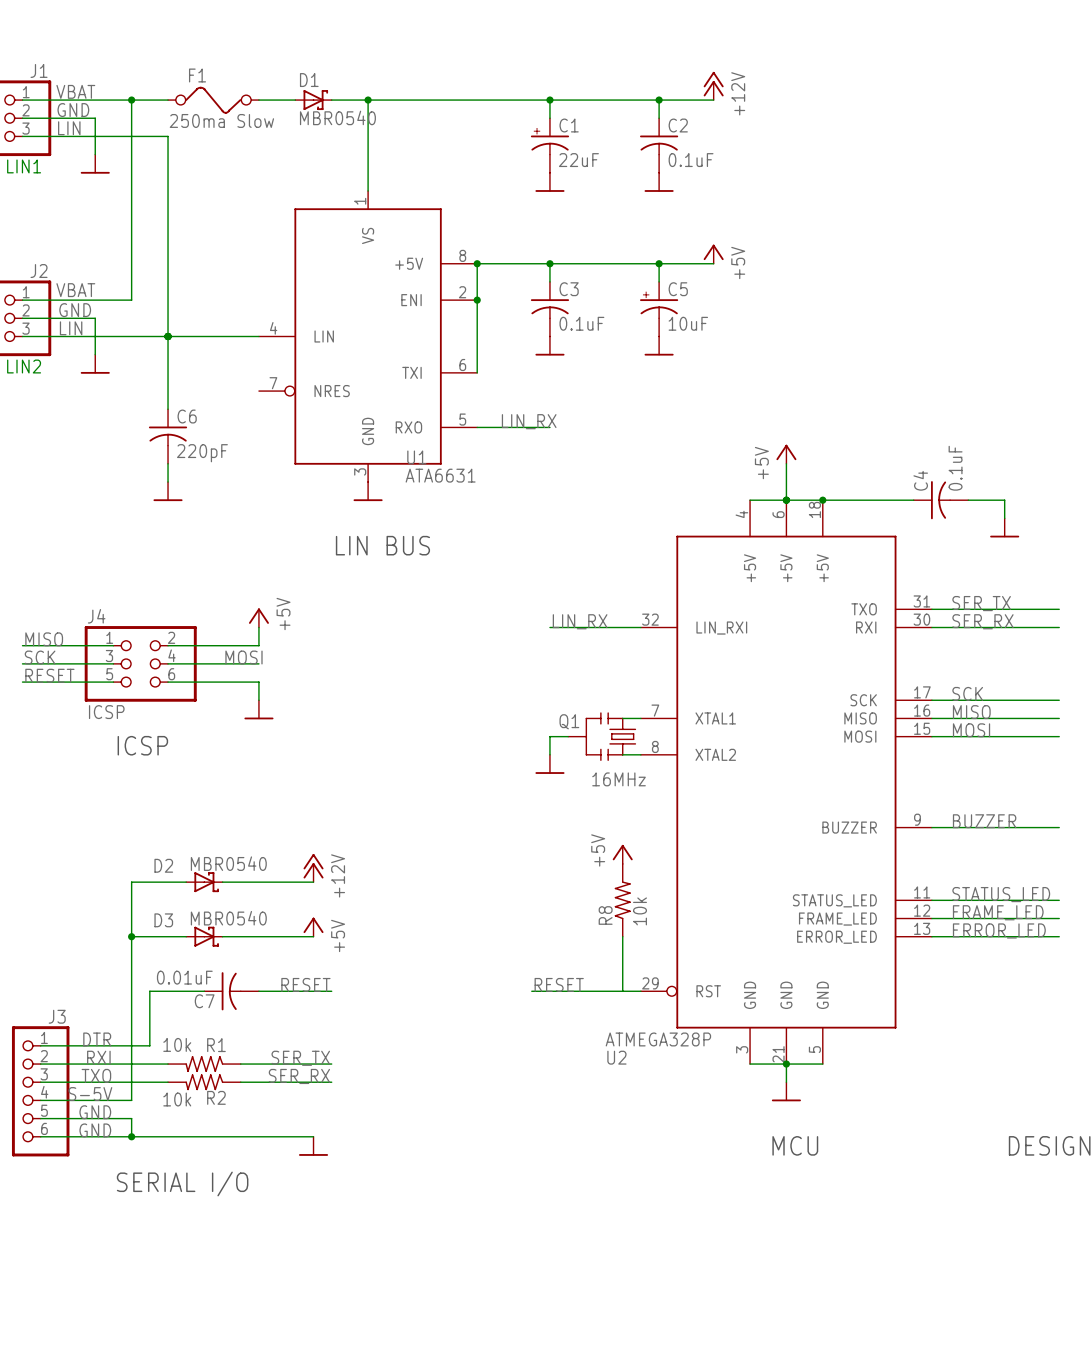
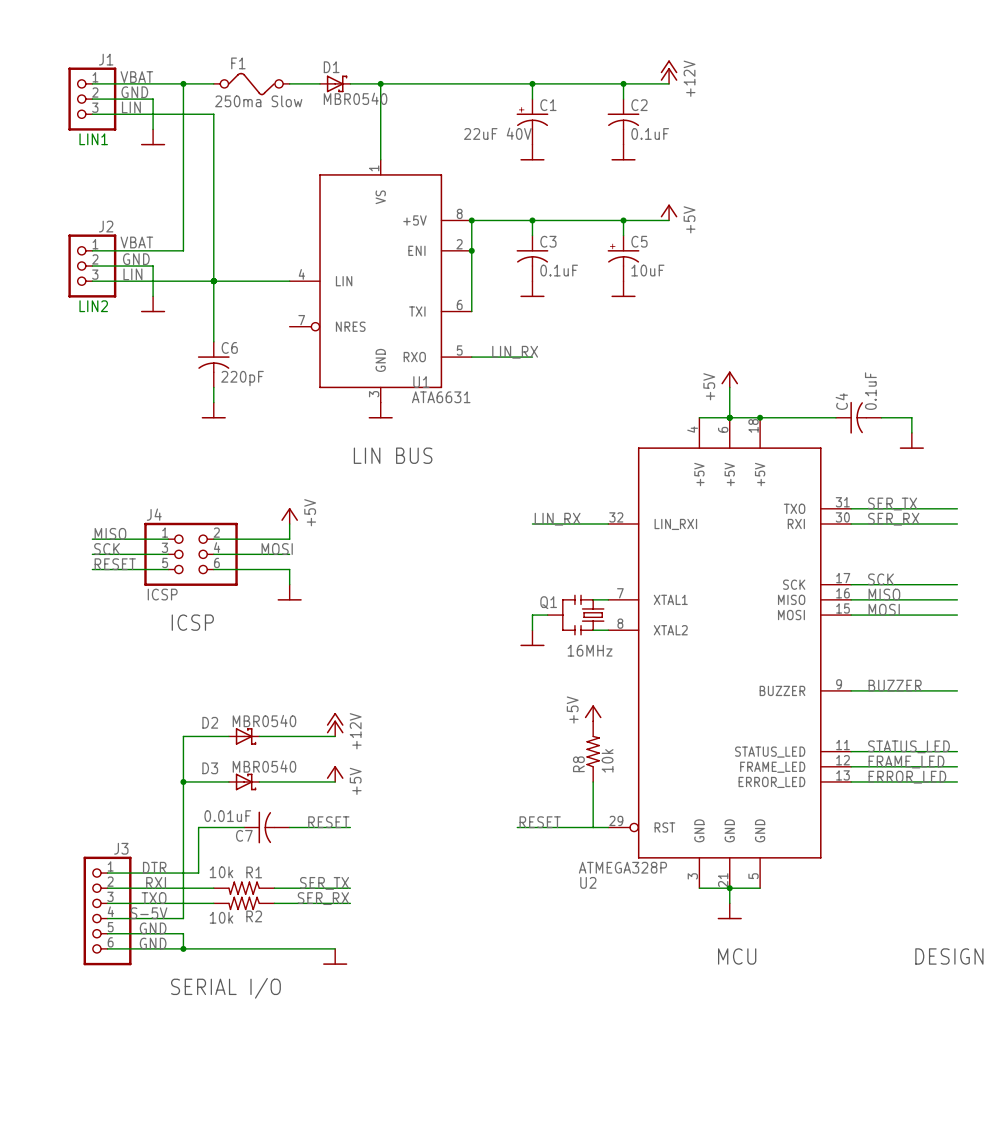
C1 value: 22uF (578, 160) -> 22uF 40V (497, 133)

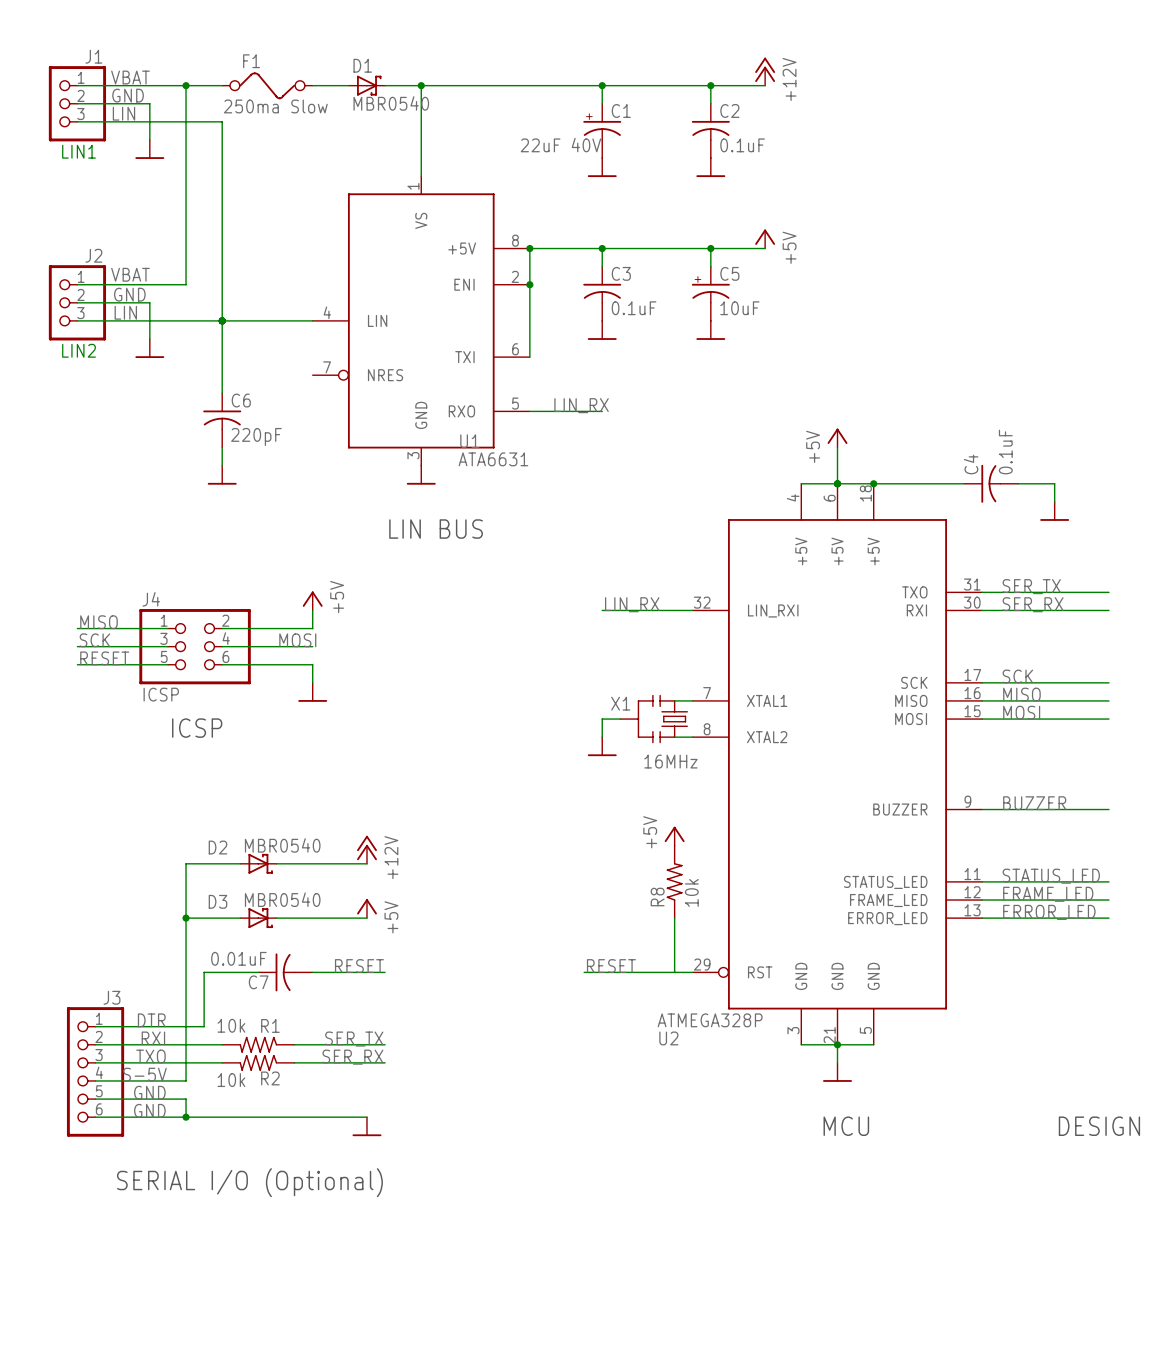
Q1 name: Q1 (548, 602) -> X1 (620, 703)
text: SERIAL I/O (225, 988) -> SERIAL I/O (Optional) (249, 1182)

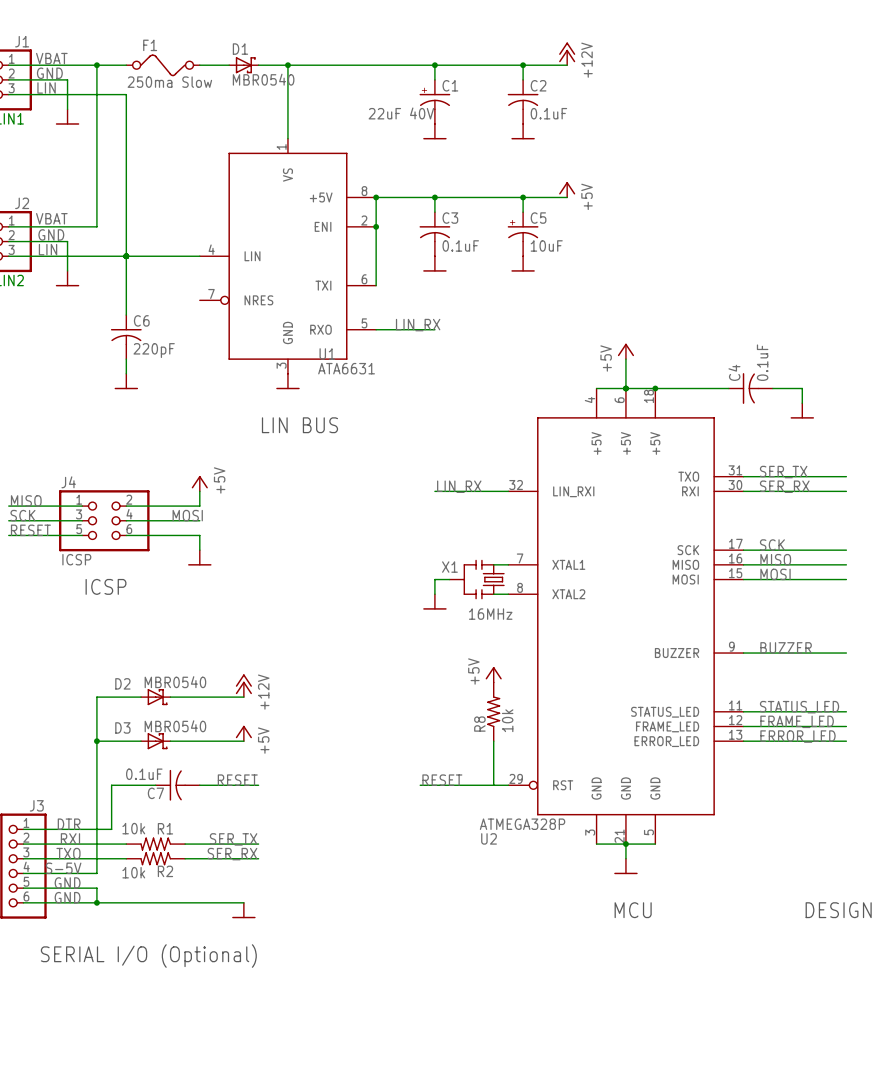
C7 value: 0.01uF (238, 958) -> 0.1uF (144, 774)

